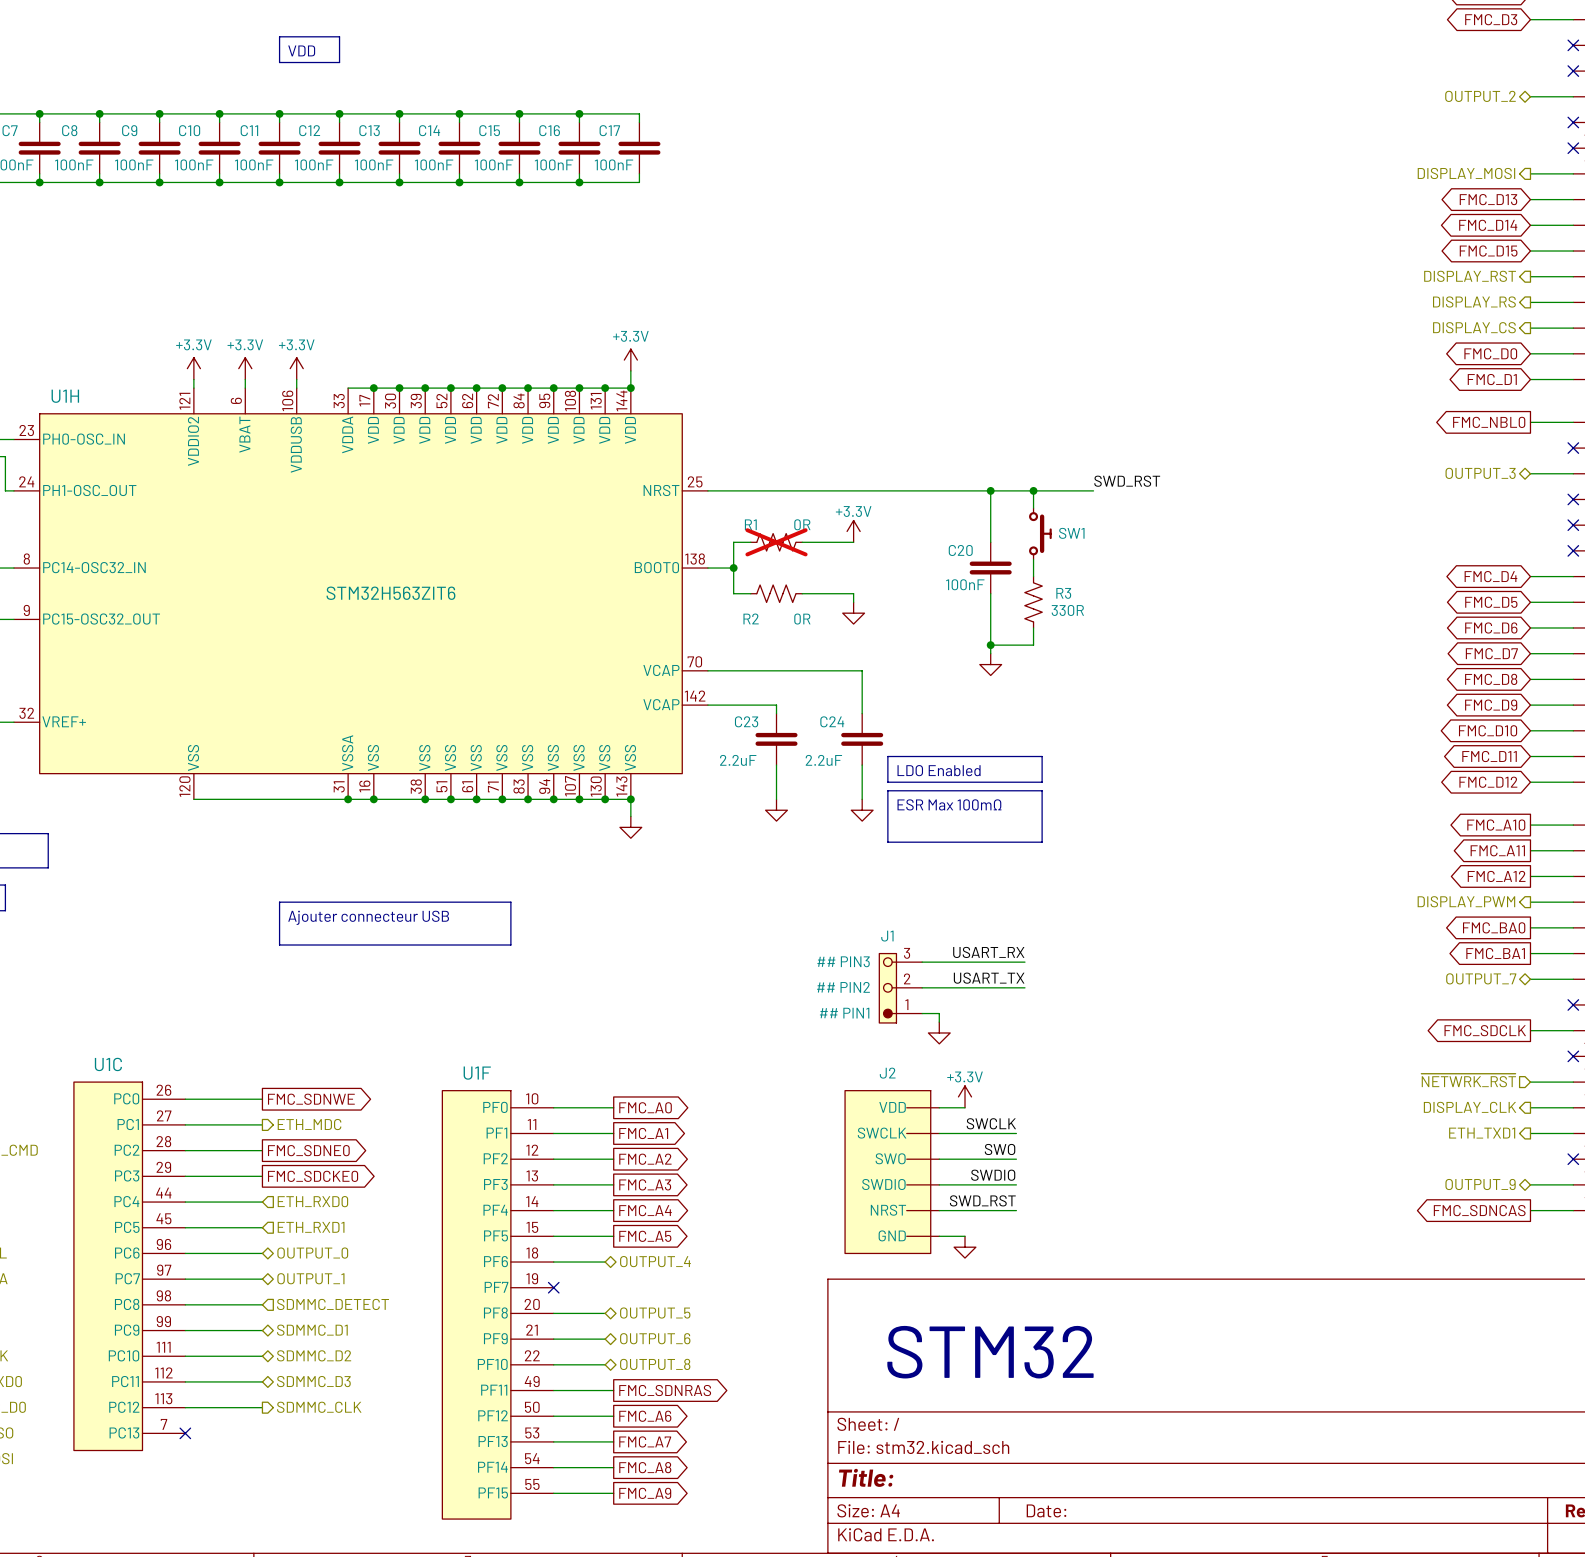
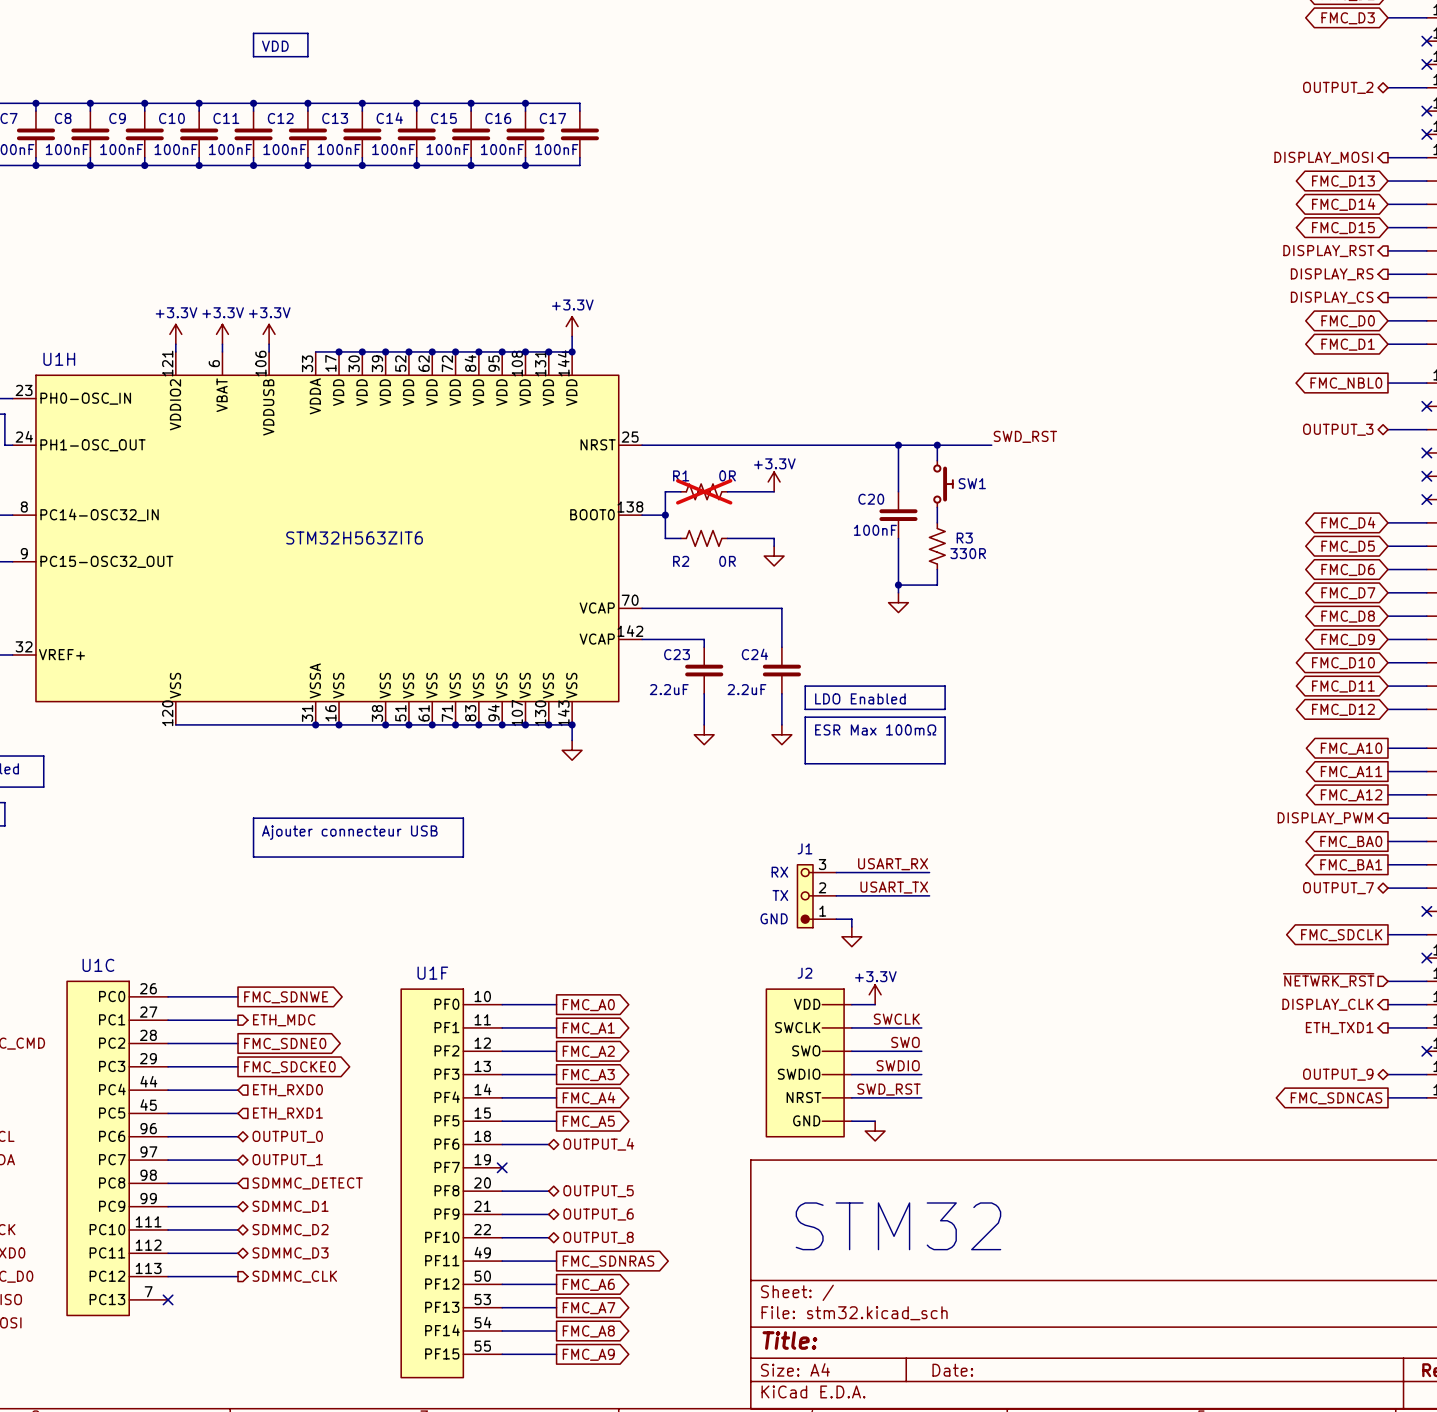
J1 text: ## PIN3 (843, 961) -> RX (779, 872)
J1 text: ## PIN2 (843, 987) -> TX (780, 895)
J1 text: ## PIN1 (844, 1013) -> GND (774, 918)

